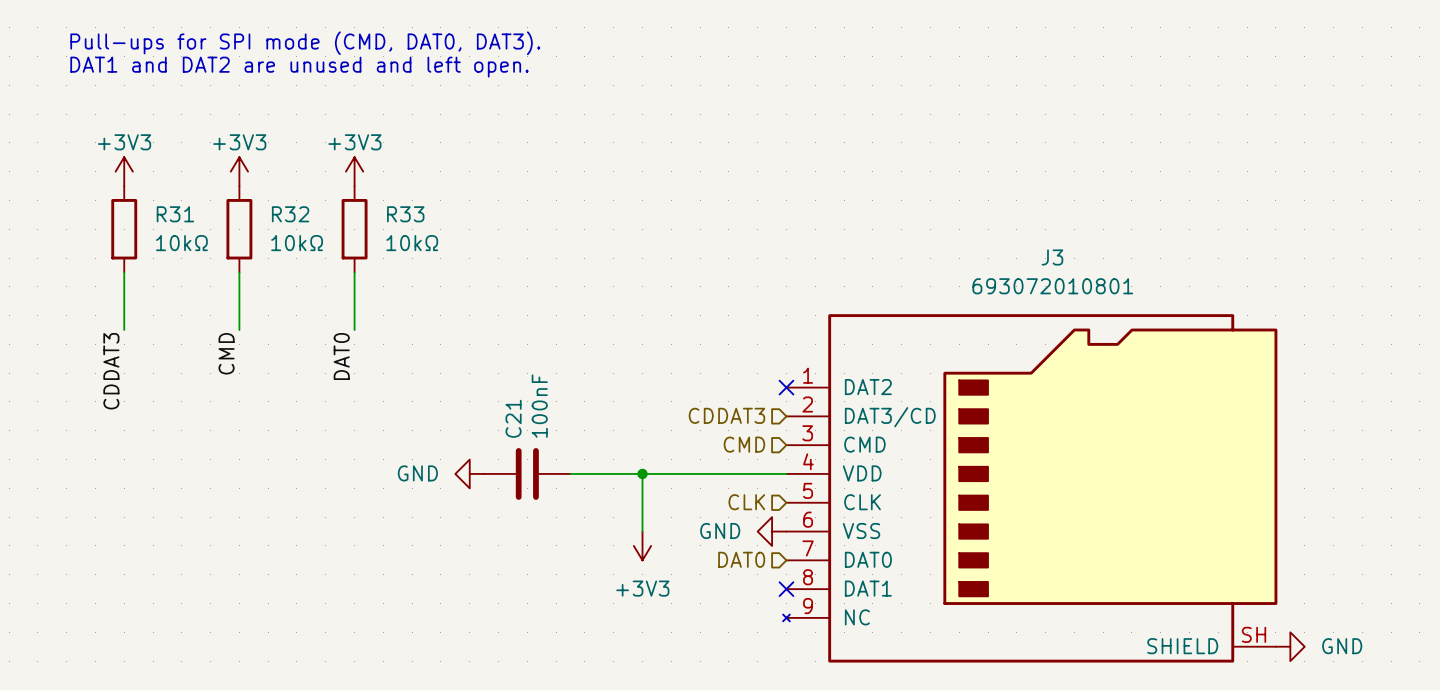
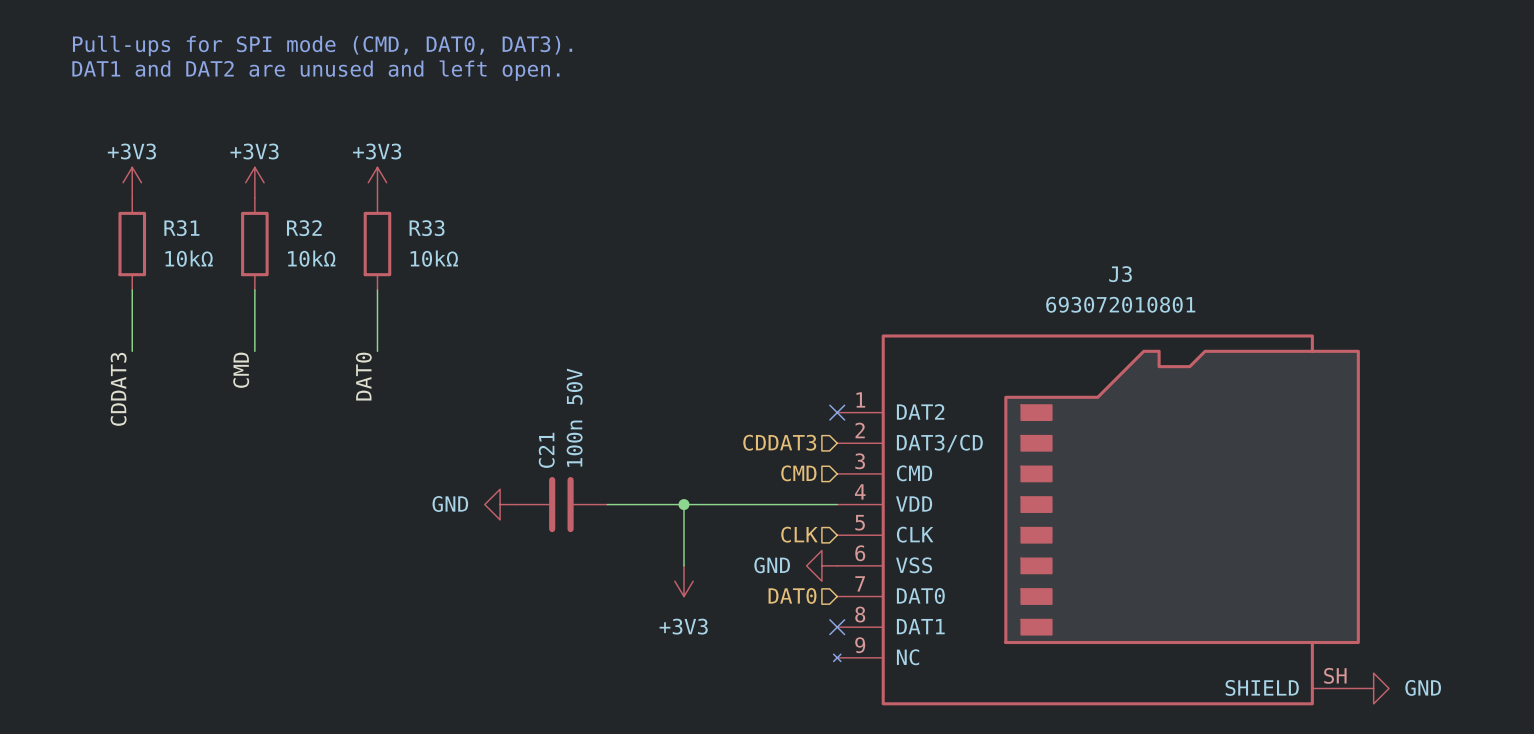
C21 value: 100nF (539, 406) -> 100n 50V (574, 417)

